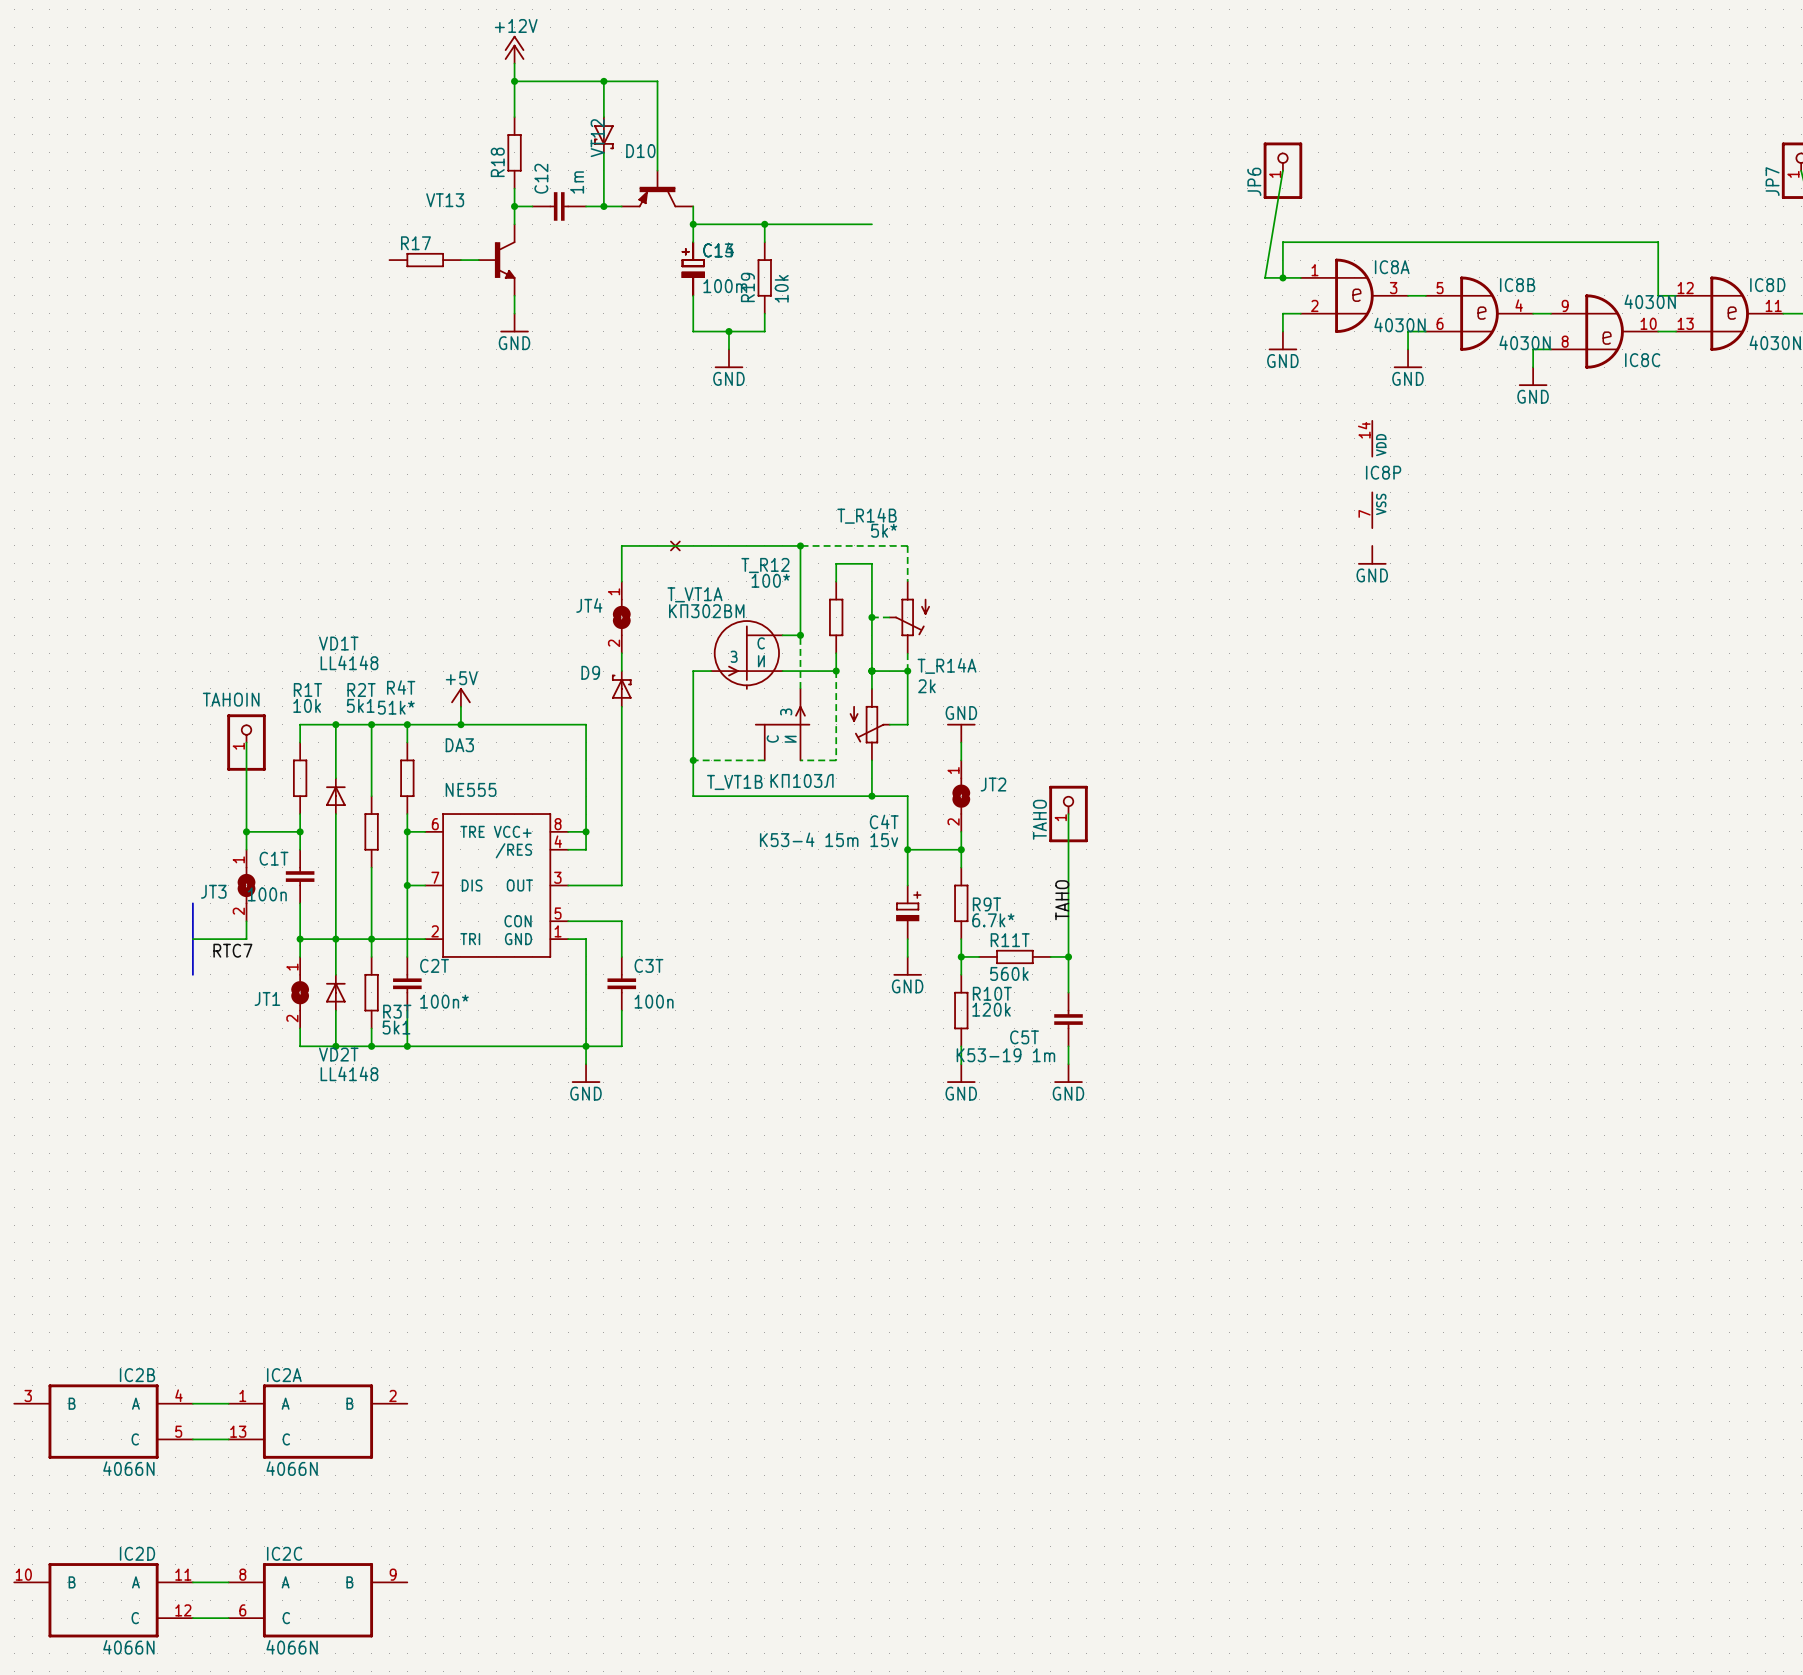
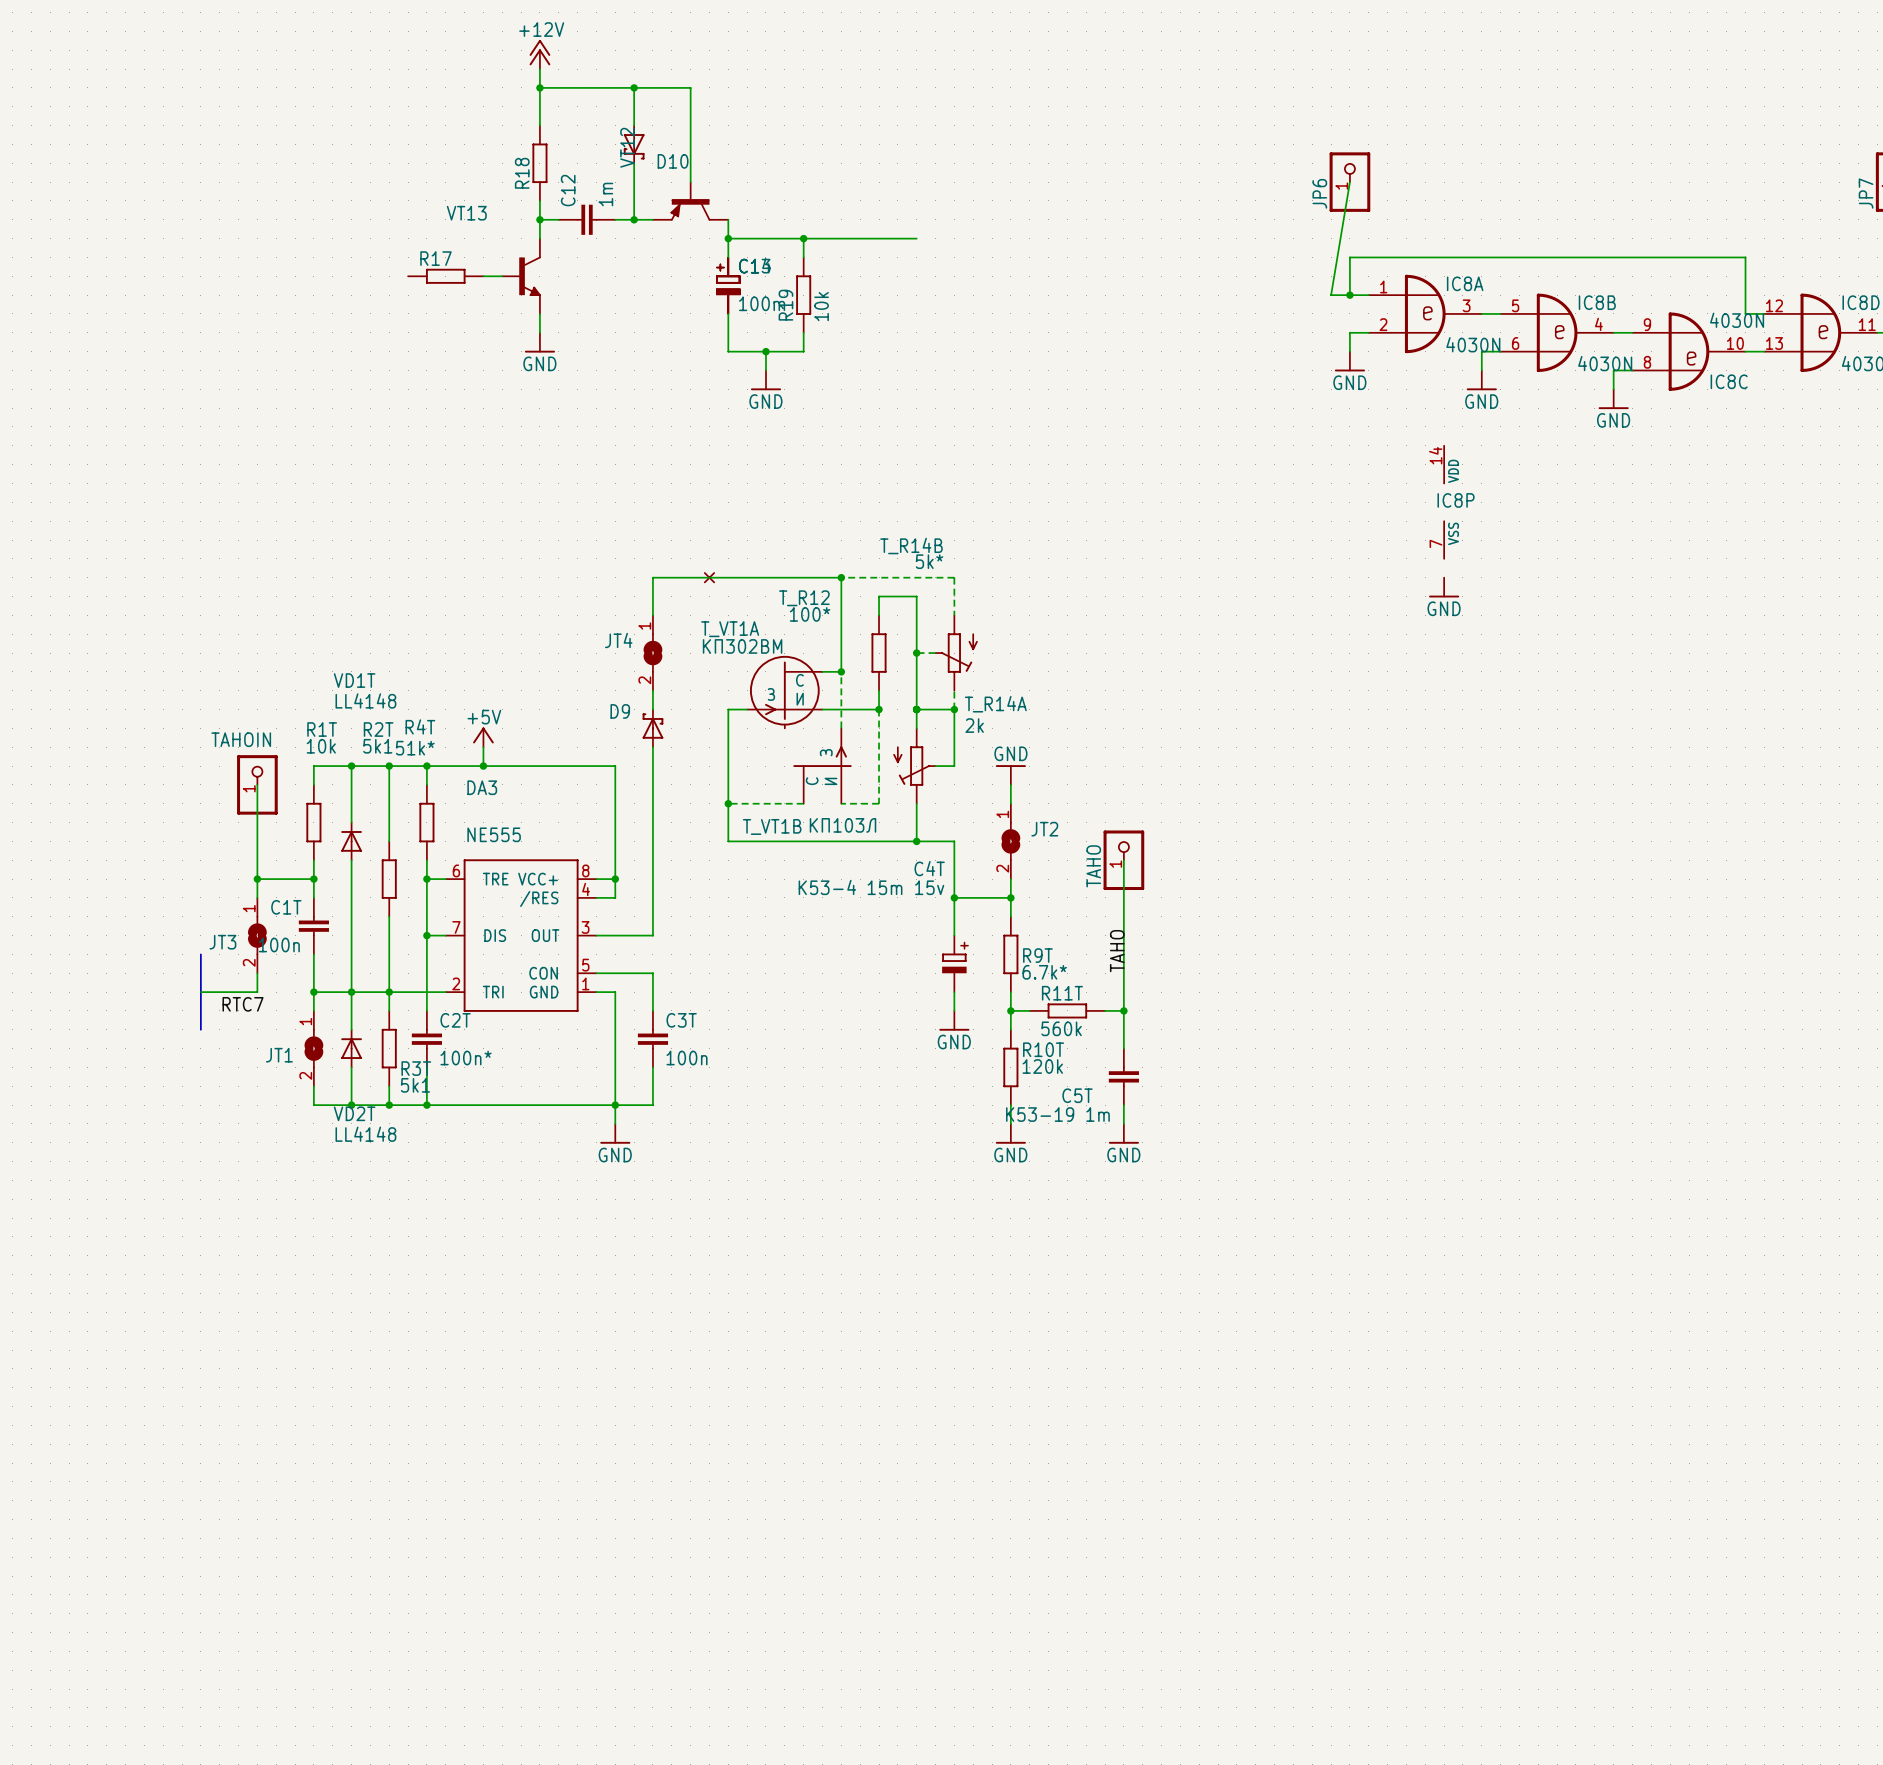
wire: (192, 1403) (228, 1403) -> none
IC2B: 4066N (103, 1421) -> none
IC2A: 4066N (318, 1421) -> none
wire: (192, 1439) (228, 1439) -> none
wire: (192, 1582) (228, 1582) -> none
IC2D: 4066N (103, 1600) -> none
IC2C: 4066N (318, 1600) -> none
wire: (192, 1618) (228, 1618) -> none

